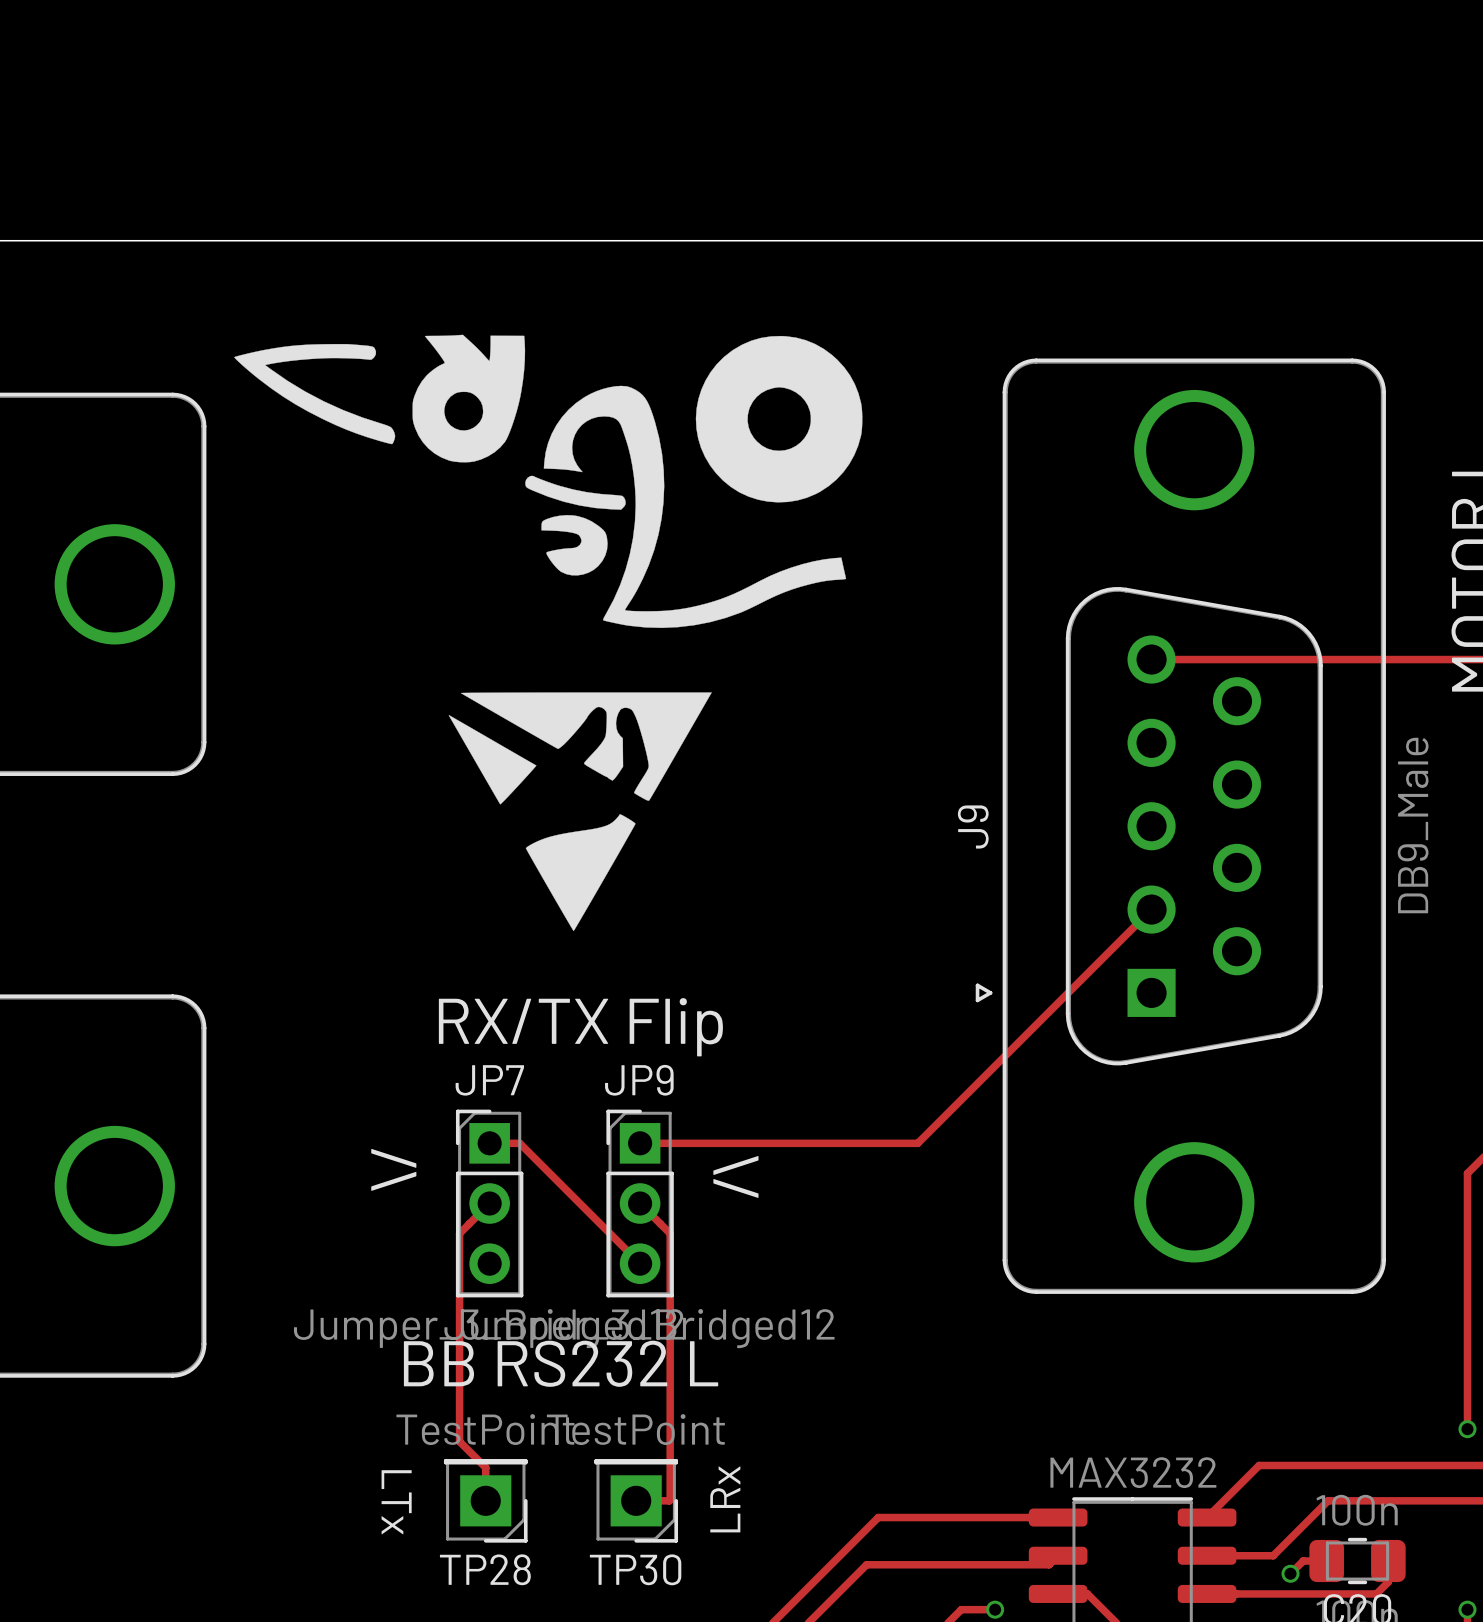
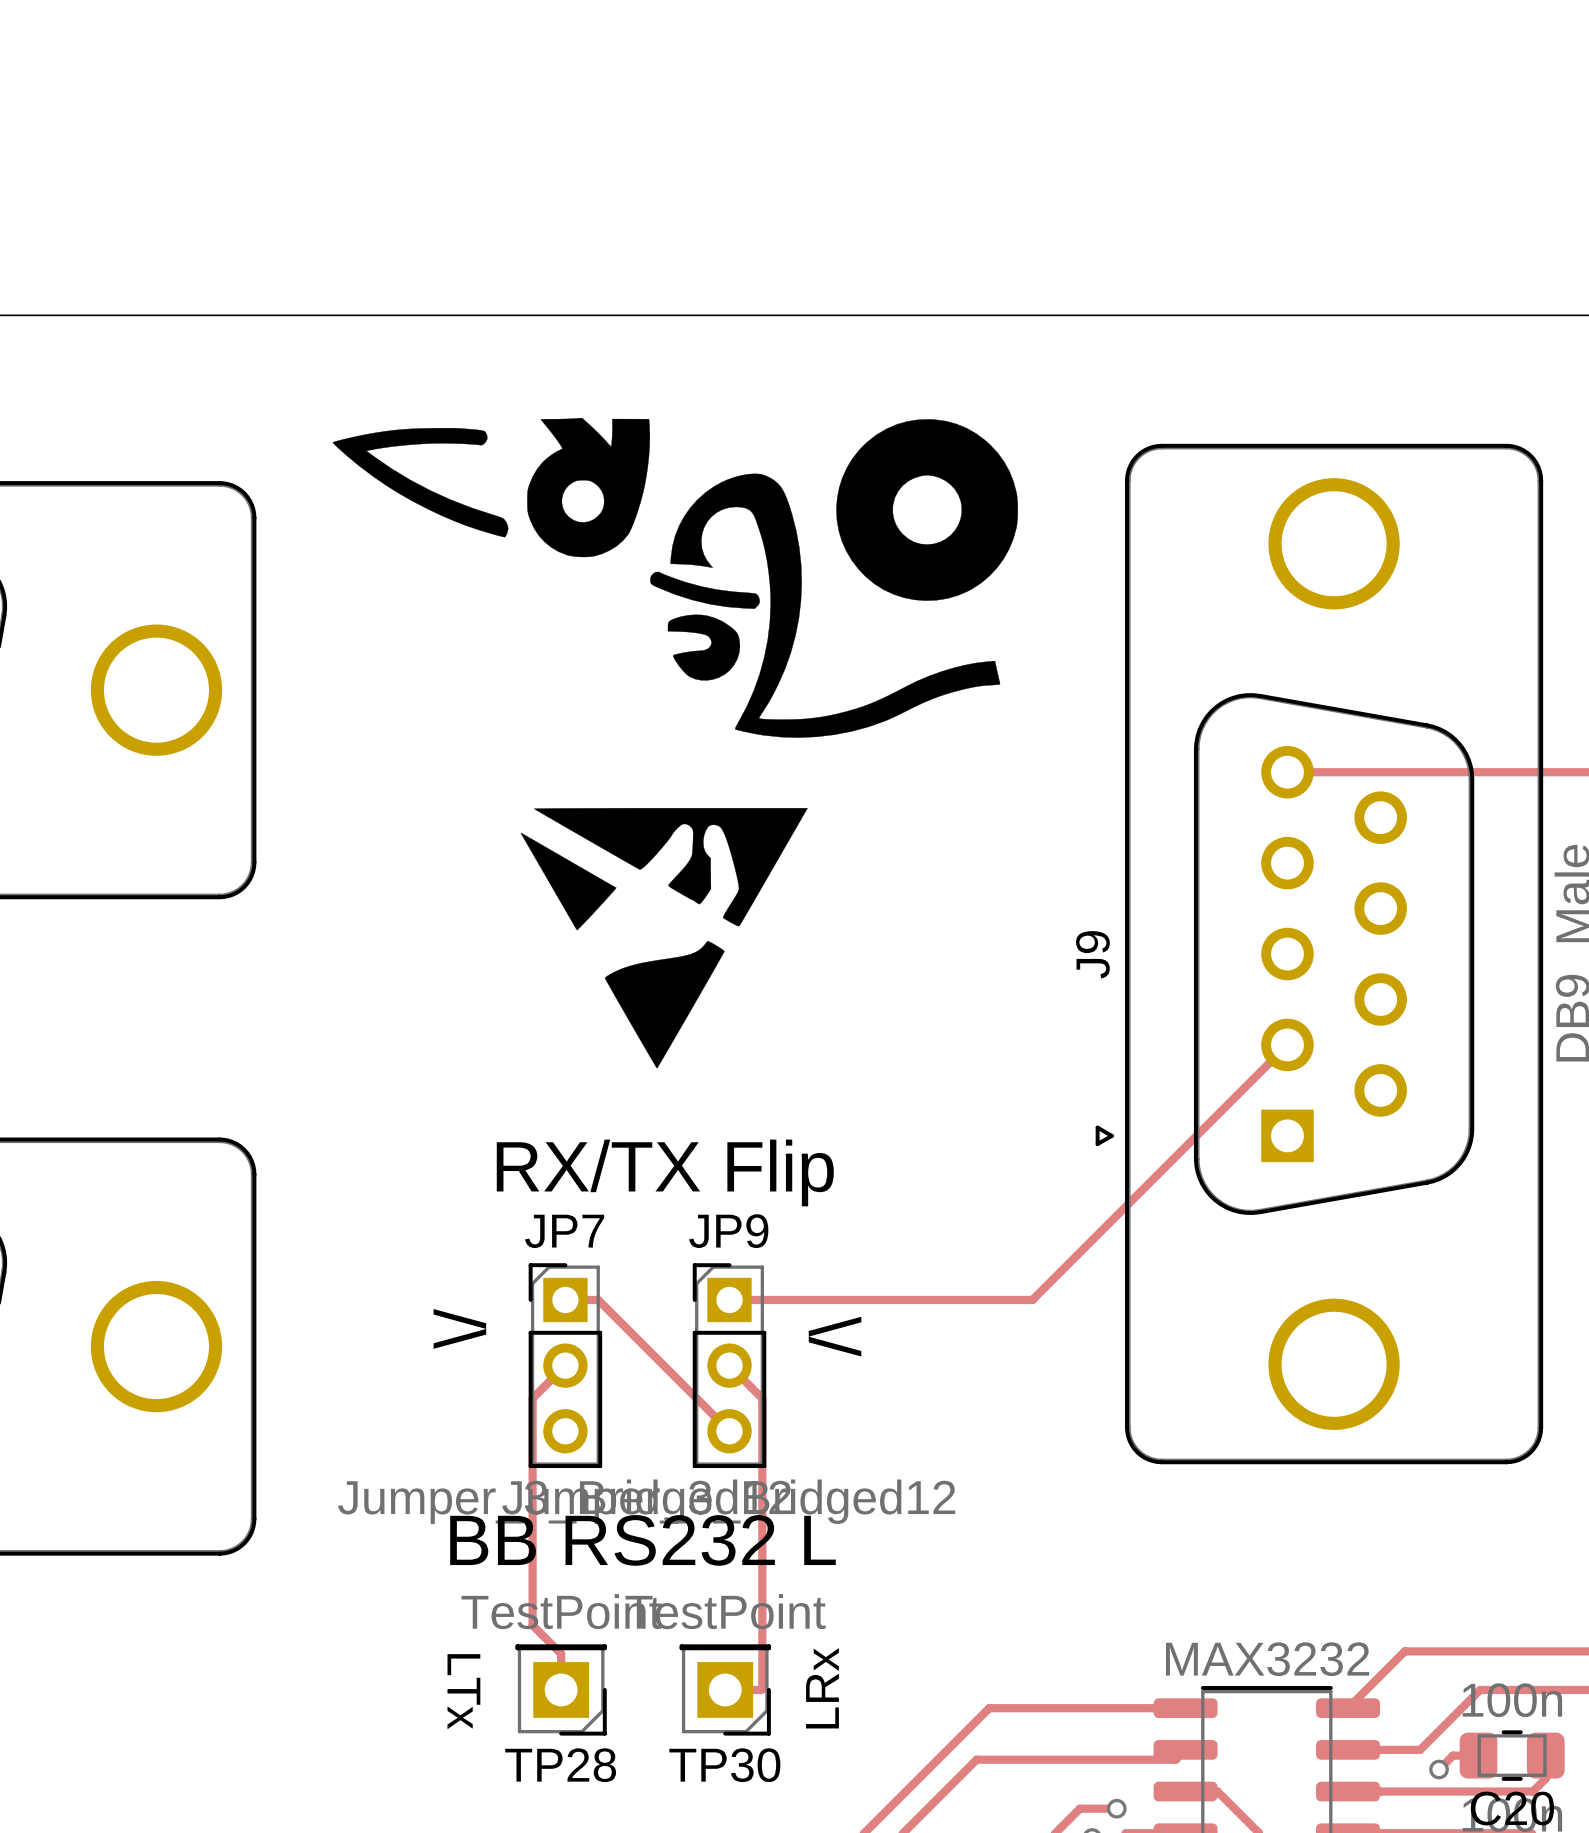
drawing position: (548, 481) -> (675, 577)

